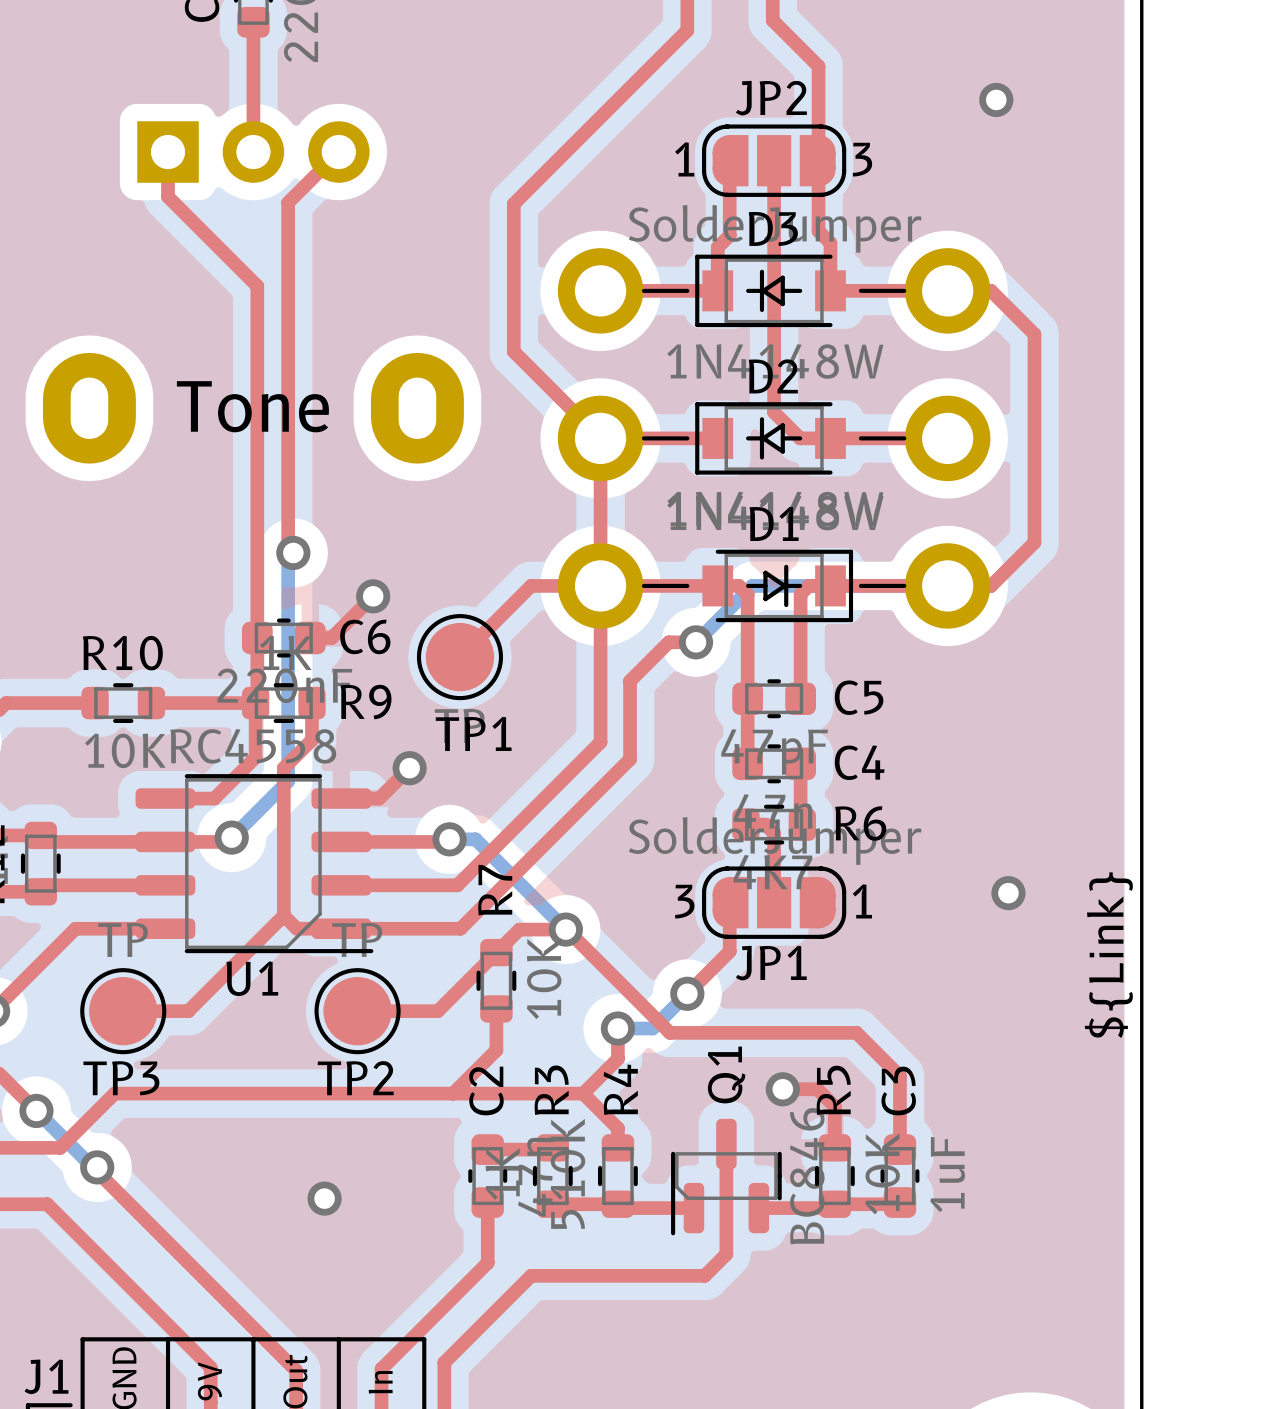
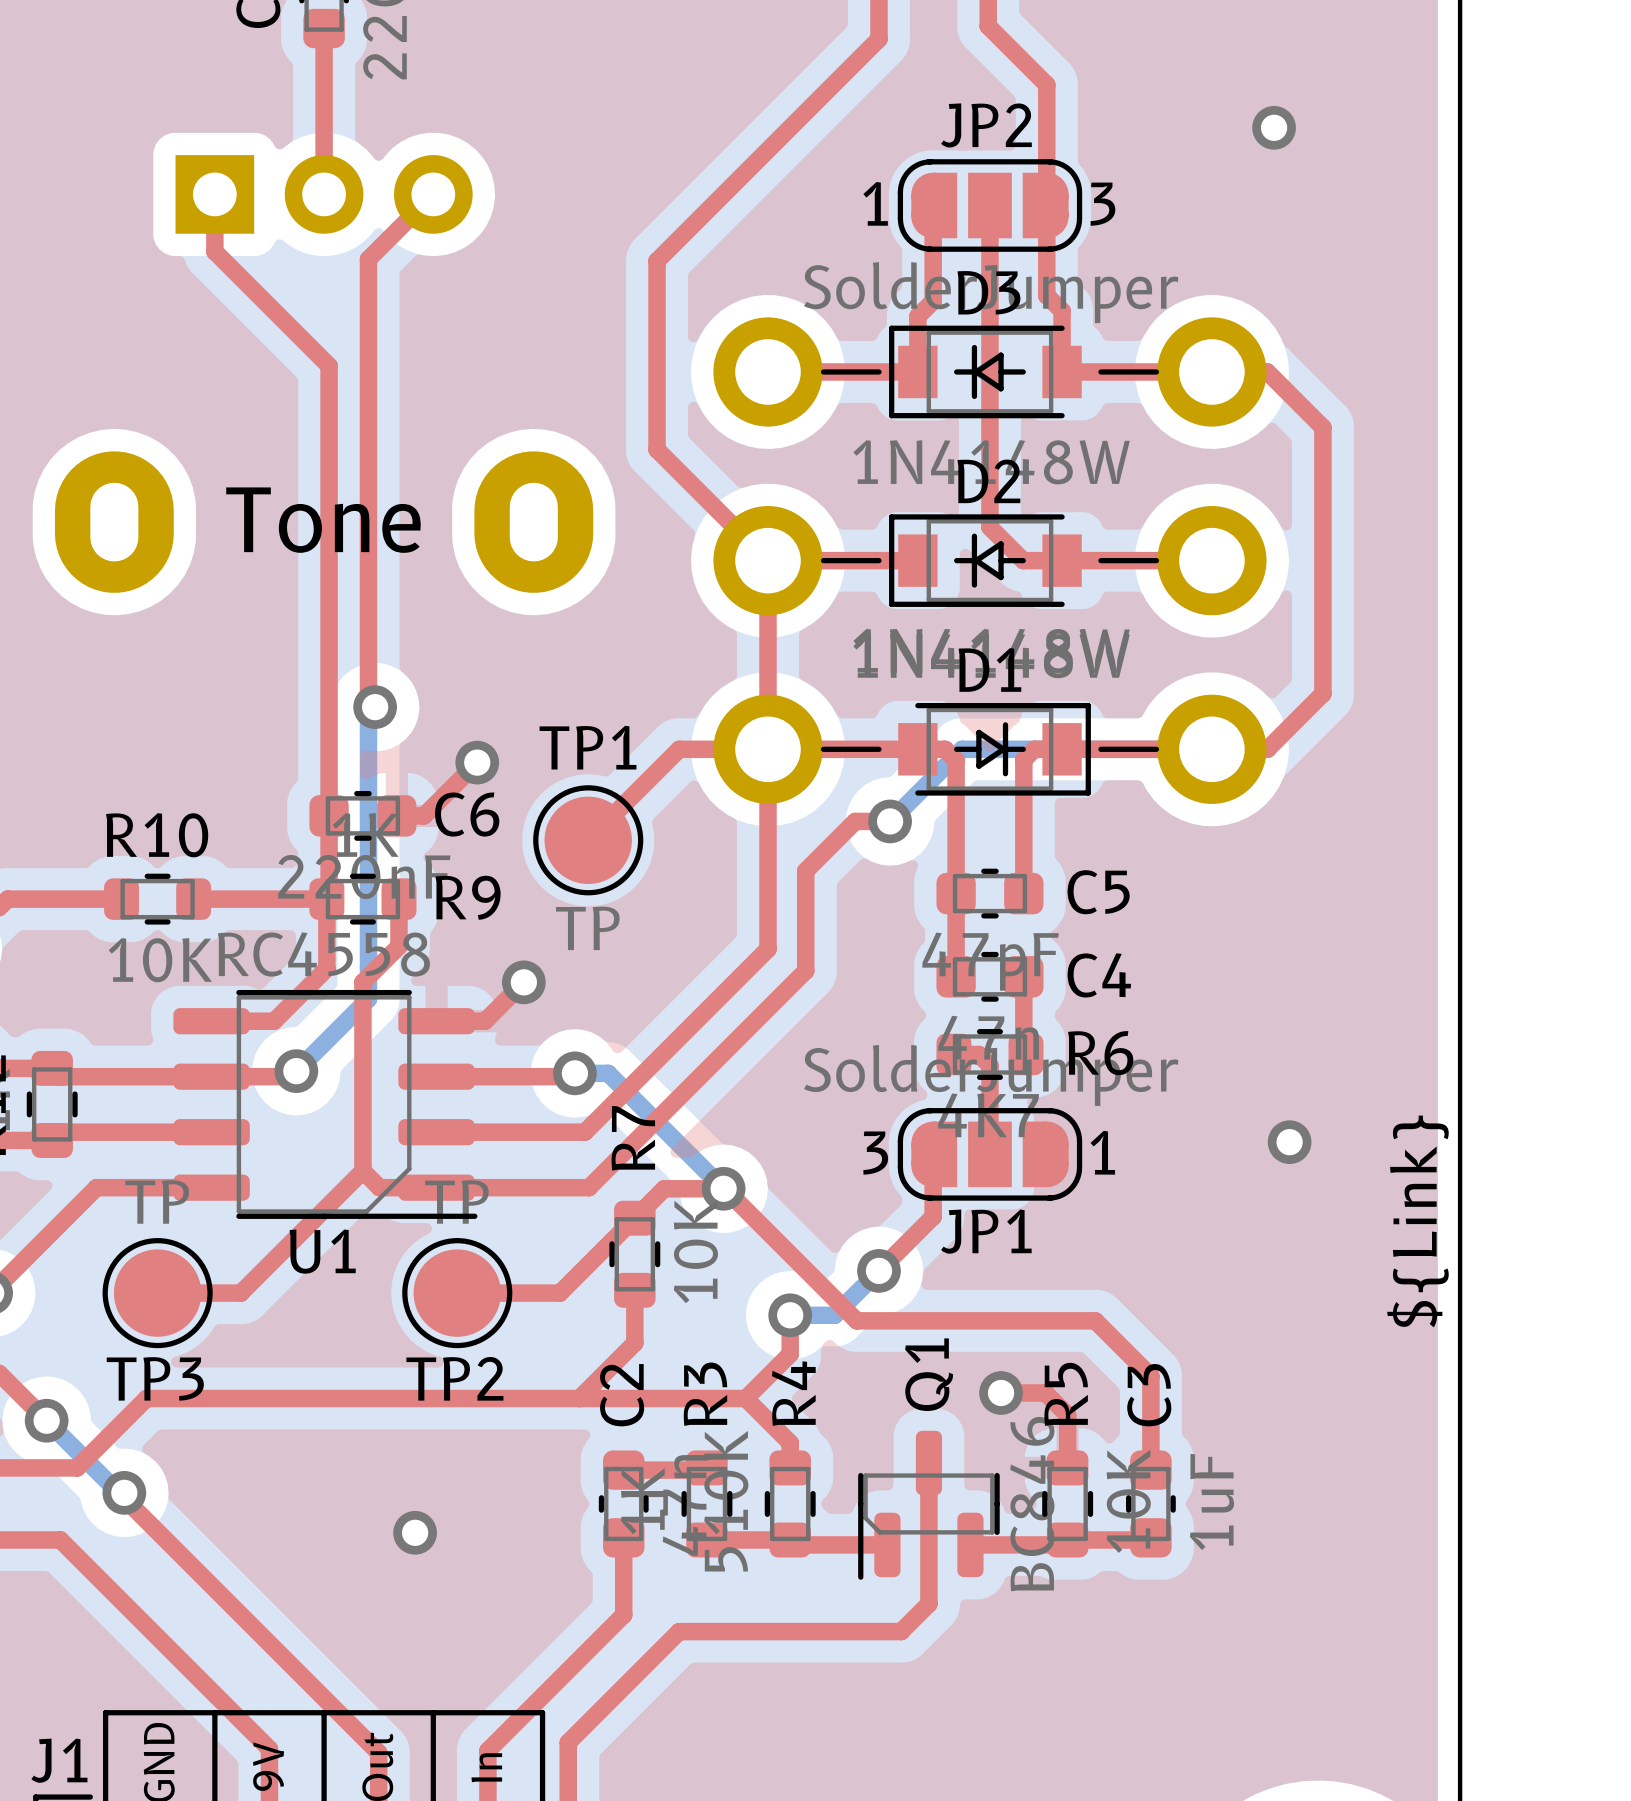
TP1 name position: TP1 (473, 733) -> TP1 (588, 747)

